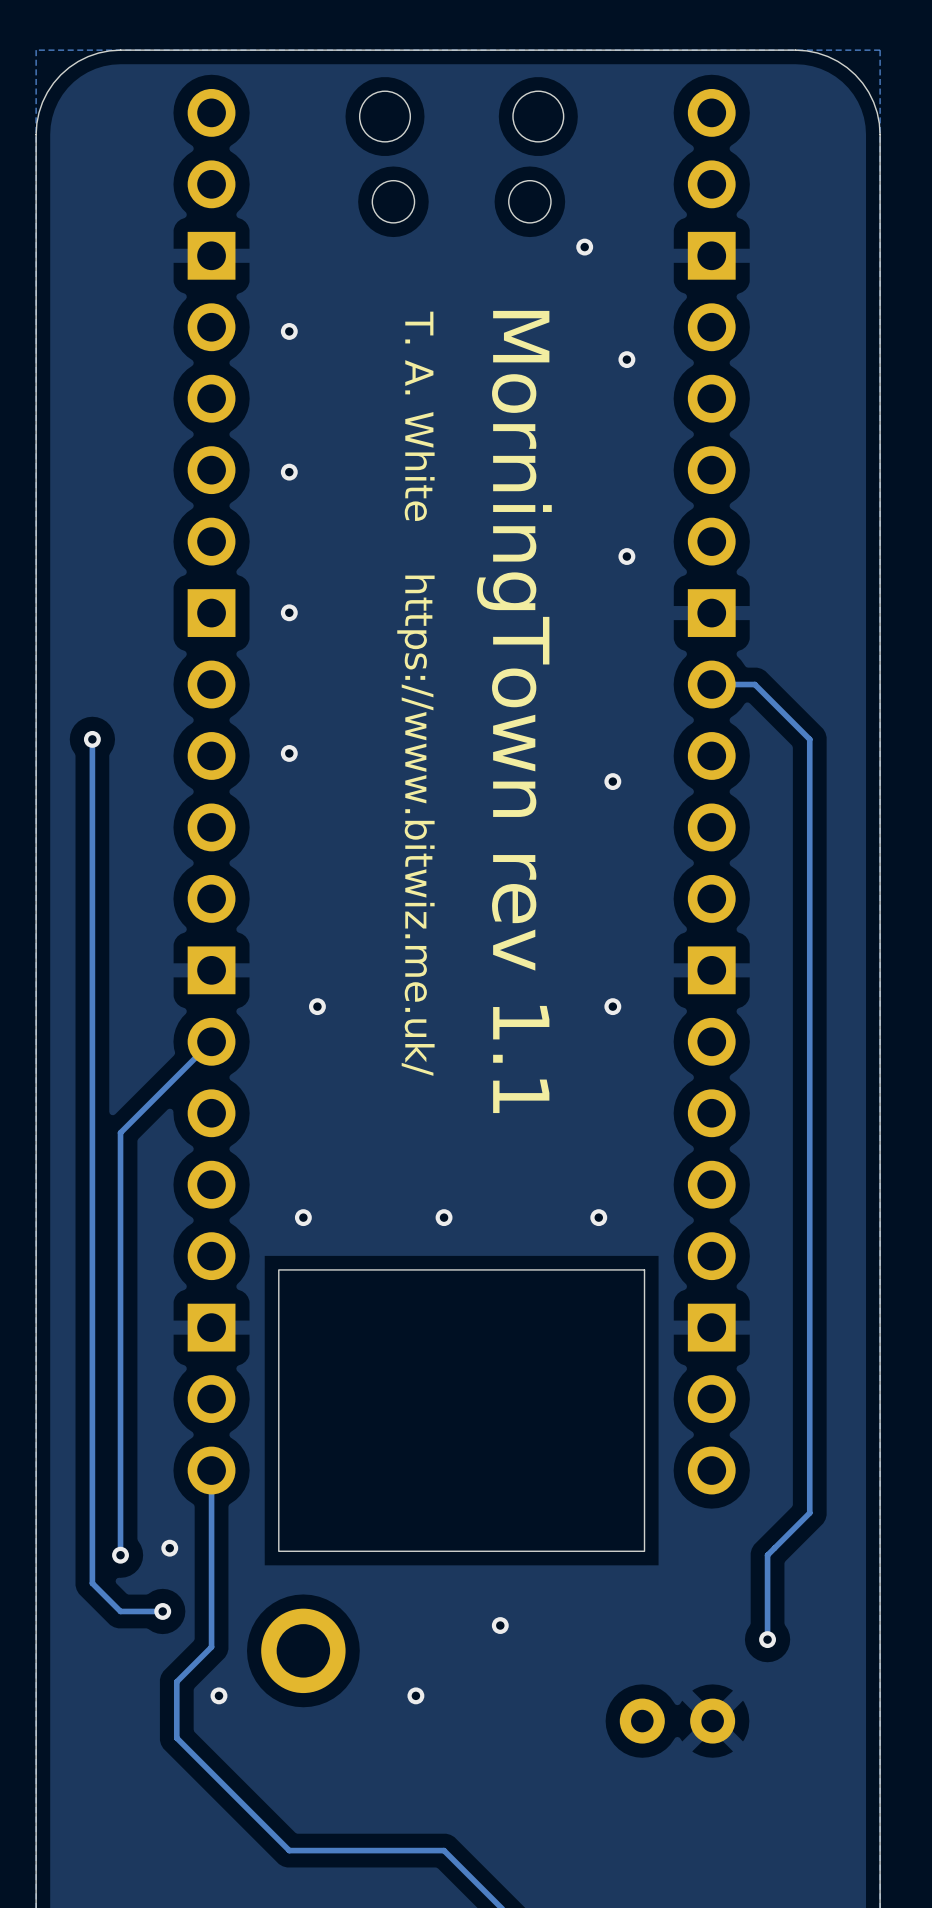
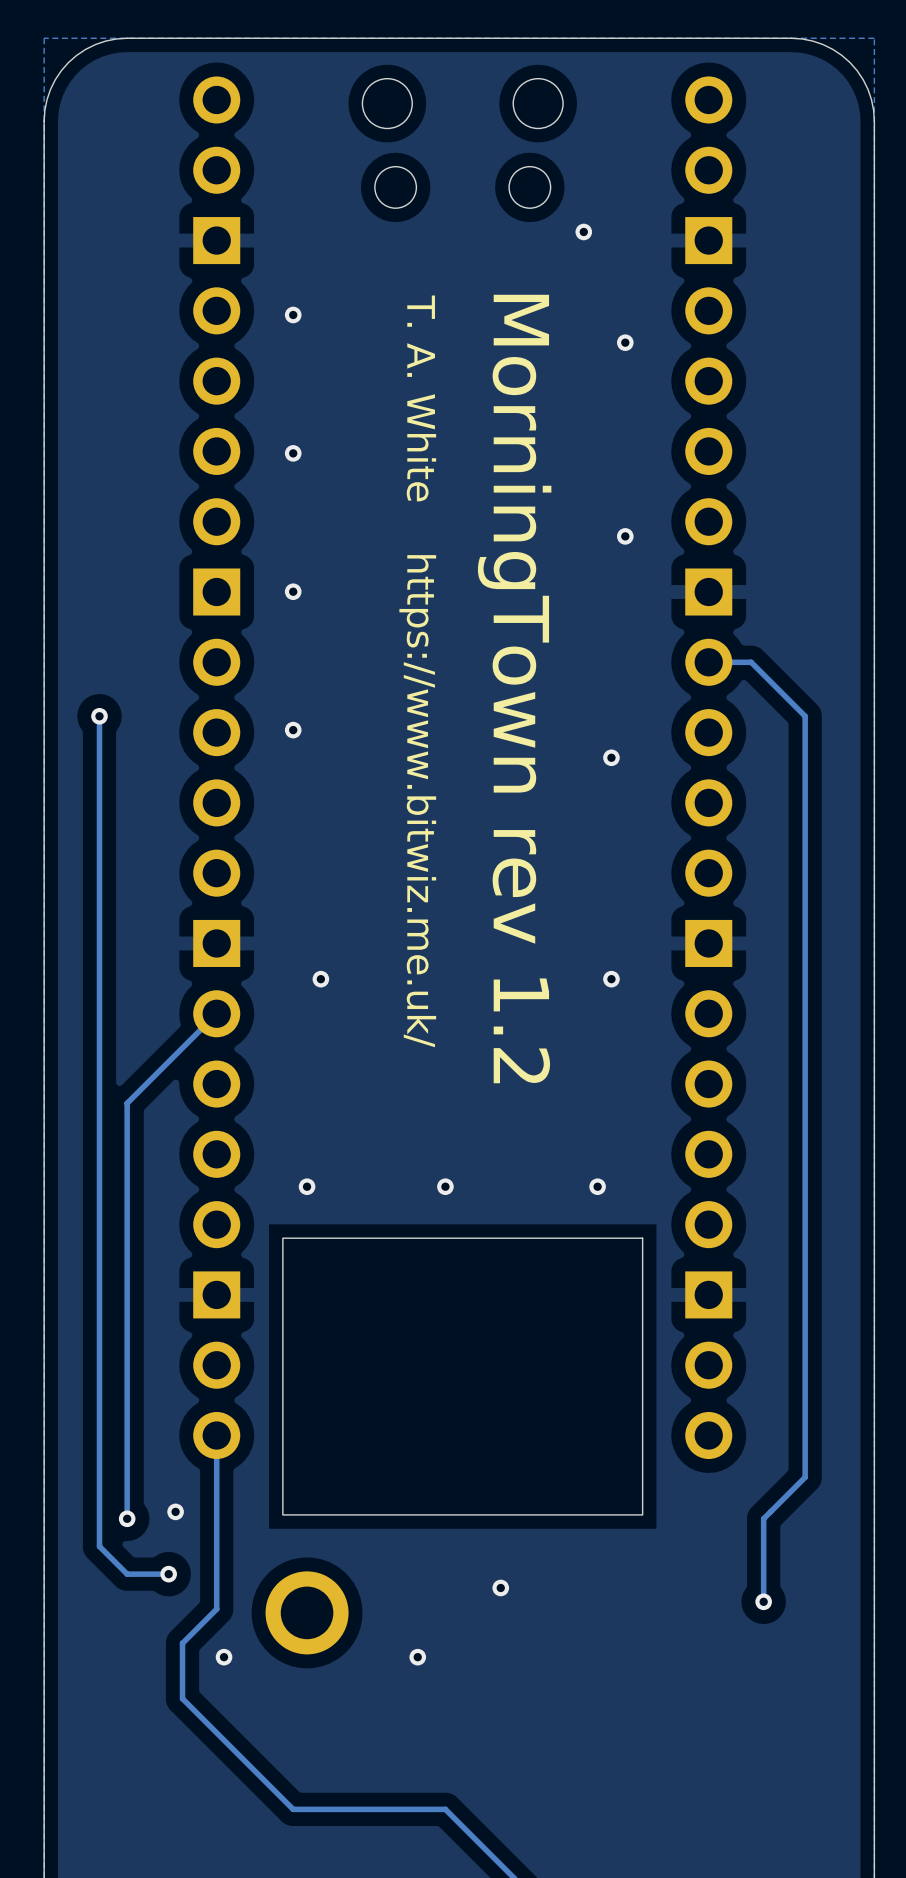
text: MorningTown rev 1.1 (514, 711) -> MorningTown rev 1.2 (514, 689)
part: (677, 1721) -> none

